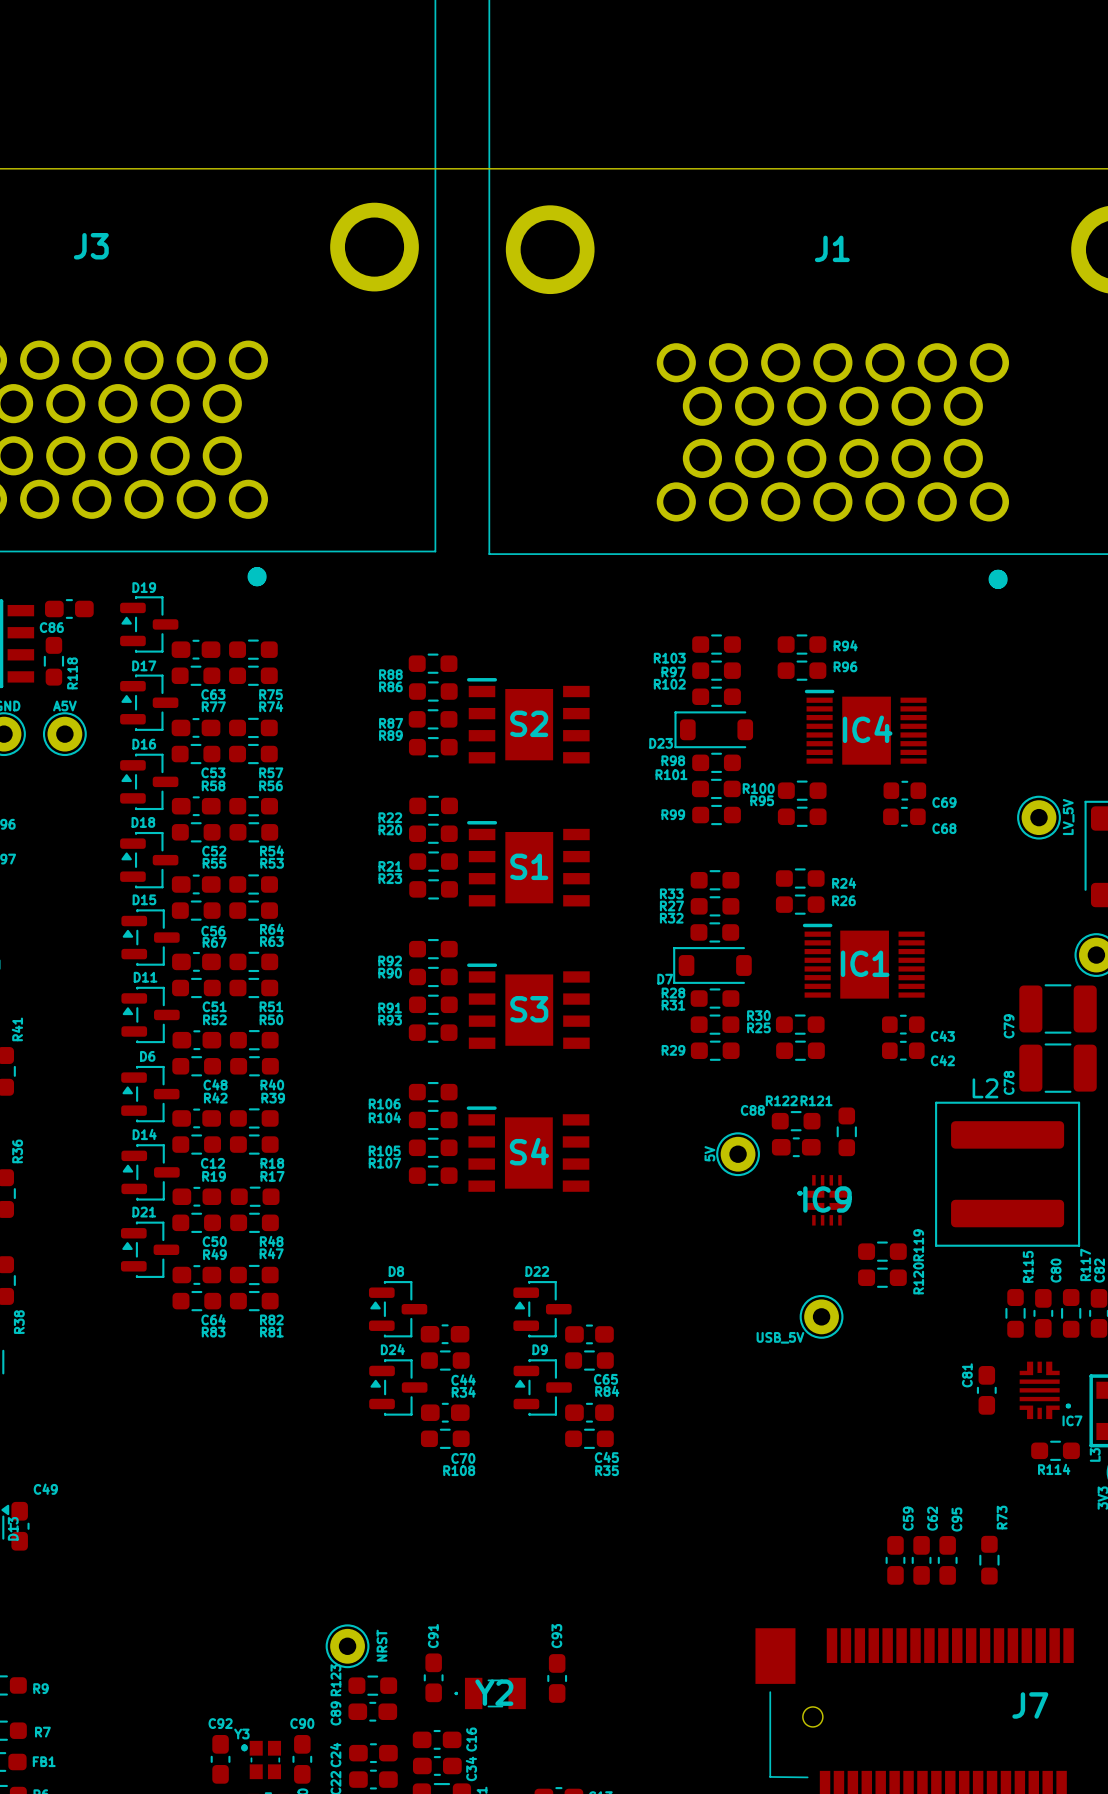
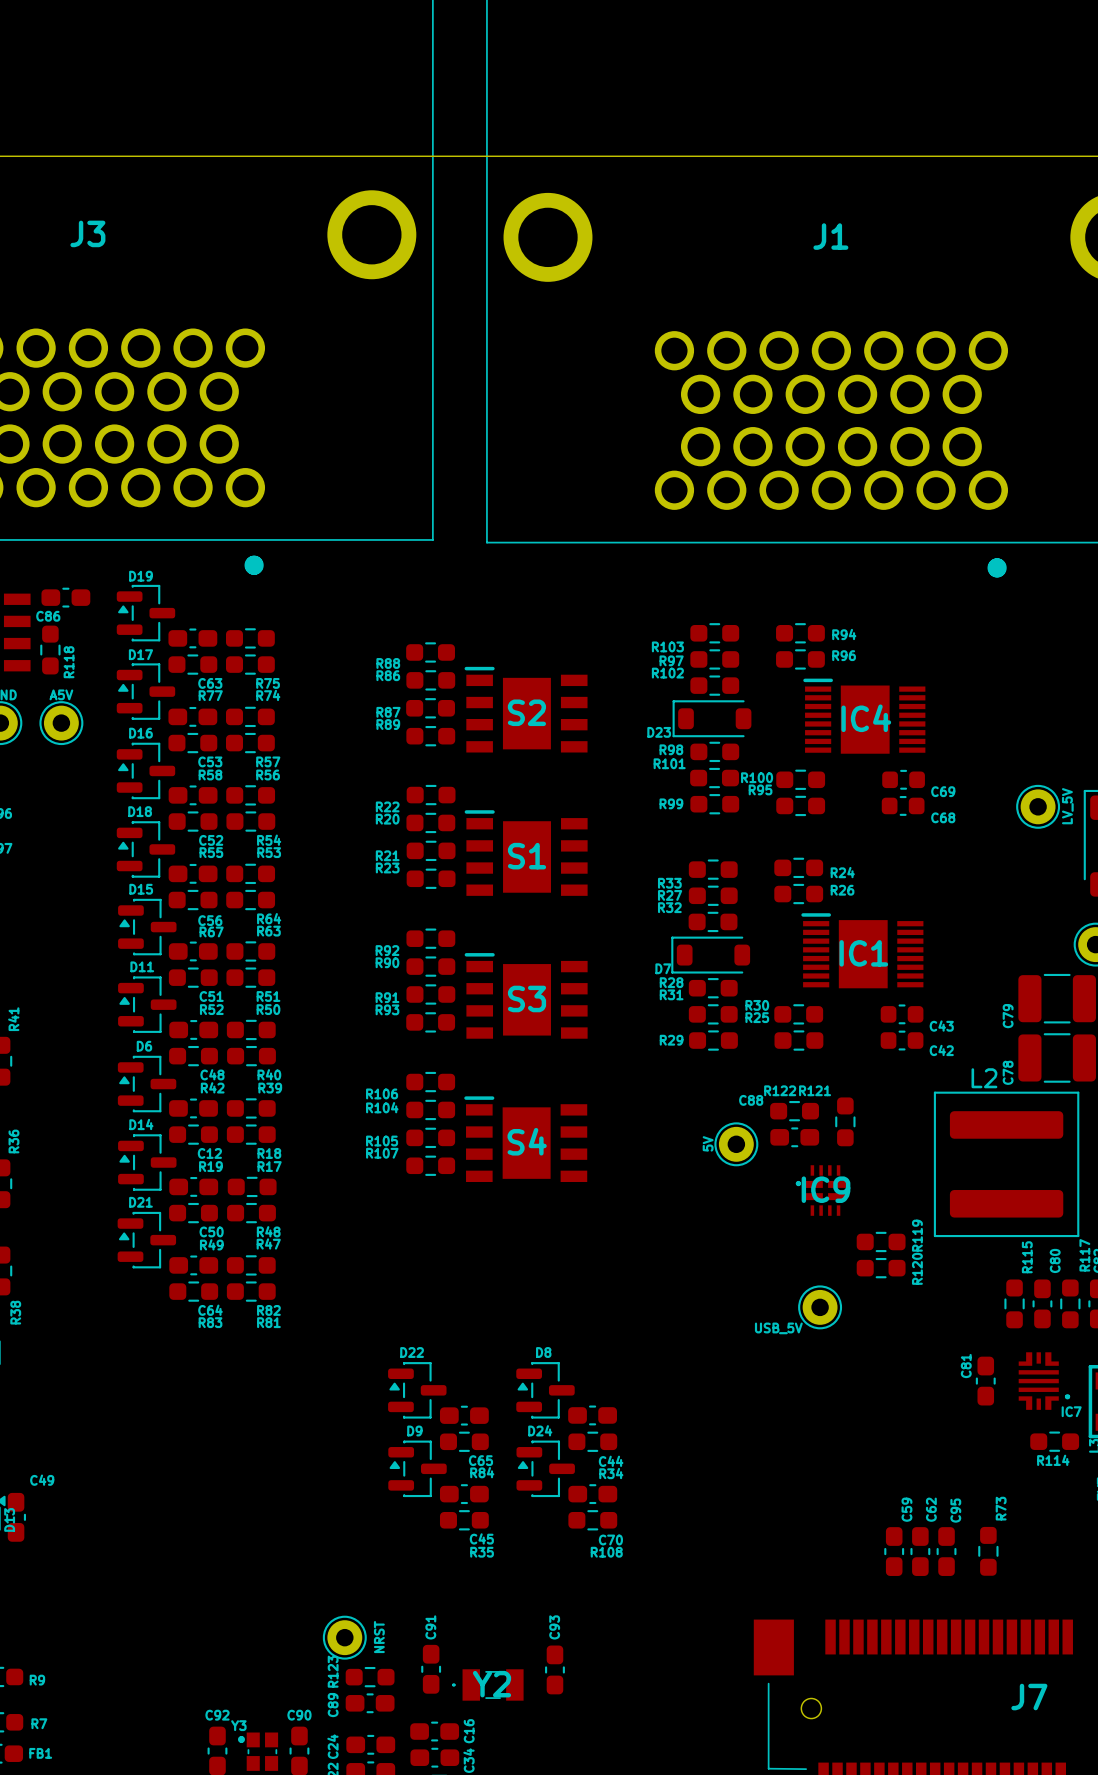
D8 position: (398, 1309) -> (545, 1390)
D22 position: (542, 1309) -> (417, 1390)
C44 position: (445, 1334) -> (592, 1415)
C65 position: (589, 1334) -> (464, 1415)
R34 position: (445, 1360) -> (592, 1441)
R84 position: (589, 1360) -> (464, 1441)
D24 position: (398, 1387) -> (545, 1468)
D9 position: (542, 1387) -> (417, 1468)
C70 position: (445, 1412) -> (592, 1494)
C45 position: (589, 1412) -> (464, 1494)
R108 position: (445, 1438) -> (592, 1520)
R35 position: (589, 1438) -> (464, 1520)

